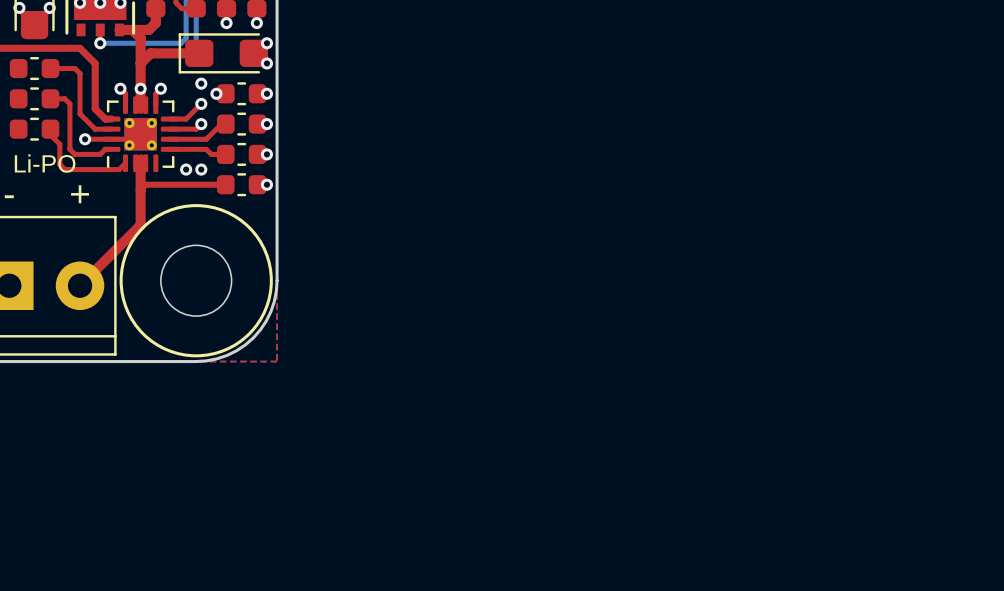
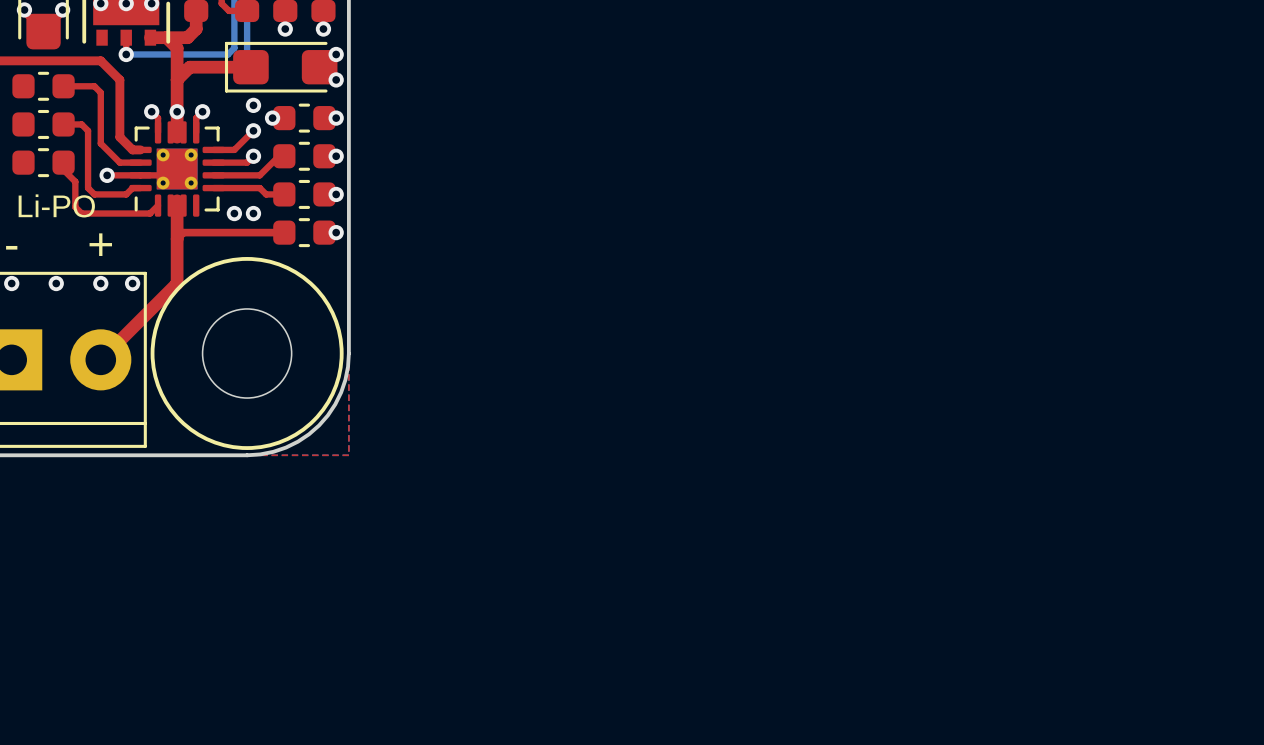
via: none -> (11, 283)
via: none -> (56, 283)
via: none -> (100, 283)
via: none -> (132, 283)

